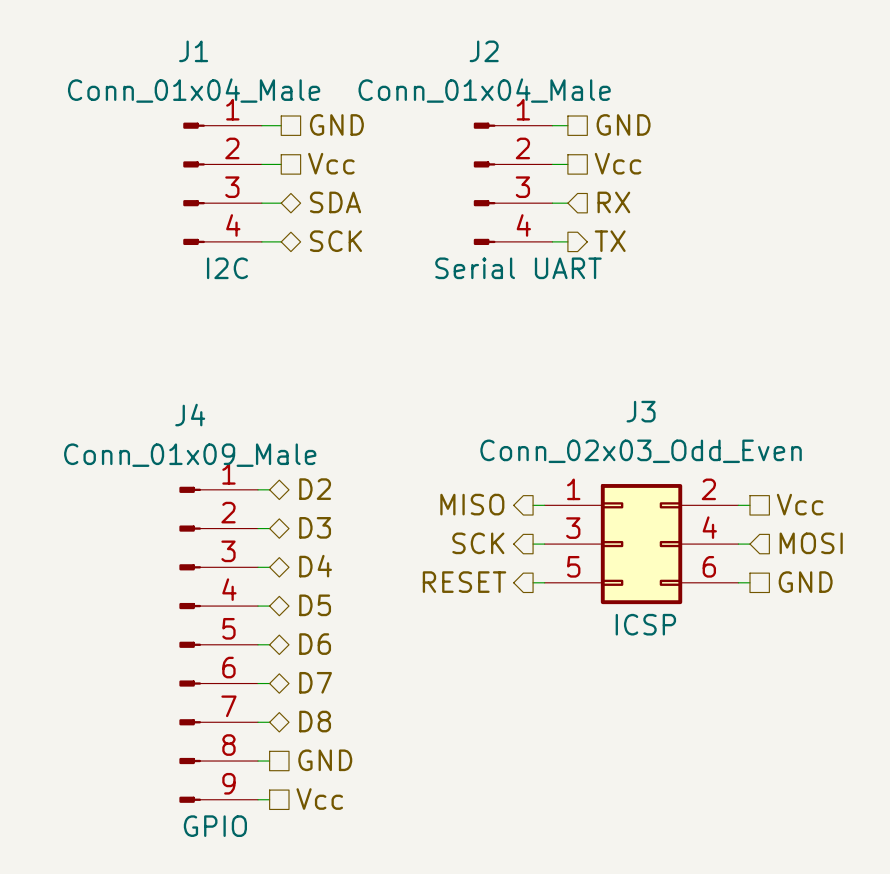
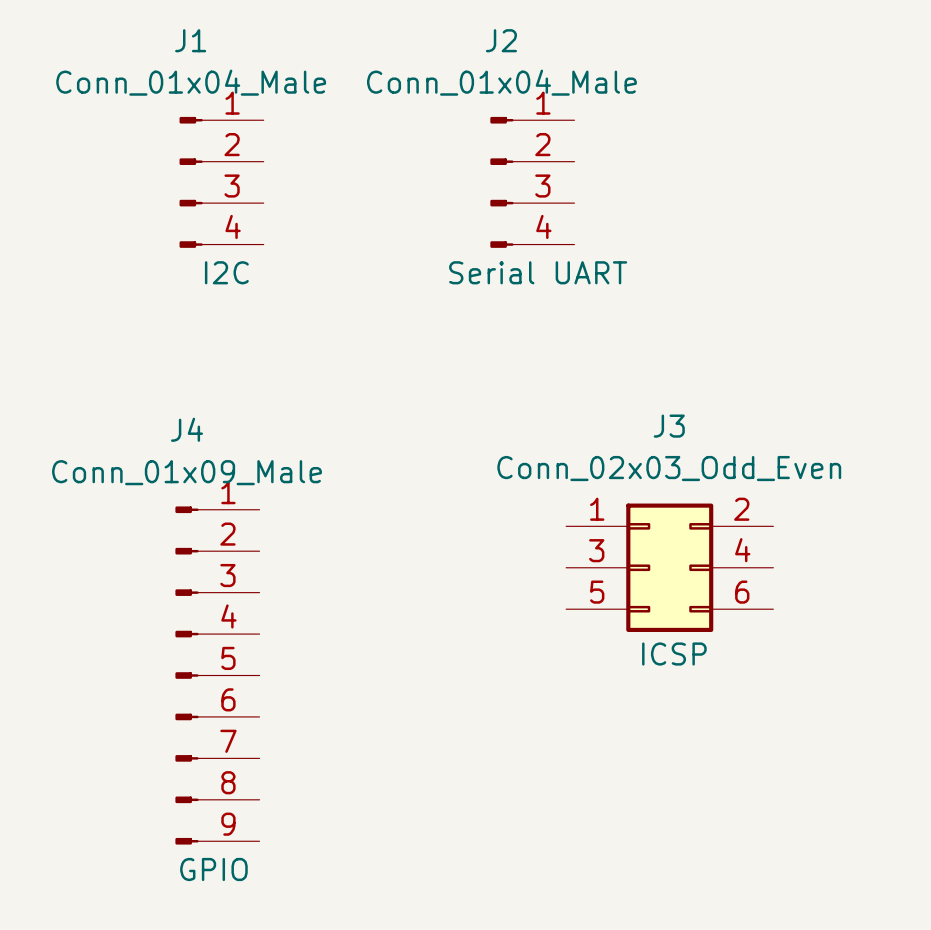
hierarchical label: GND (336, 124) -> none
hierarchical label: GND (623, 124) -> none
wire: (261, 125) (281, 125) -> none
wire: (552, 125) (567, 125) -> none
hierarchical label: Vcc (331, 163) -> none
hierarchical label: Vcc (618, 163) -> none
wire: (261, 164) (281, 164) -> none
wire: (552, 164) (567, 164) -> none
hierarchical label: SDA (335, 202) -> none
hierarchical label: RX (613, 202) -> none
wire: (261, 203) (281, 203) -> none
wire: (552, 203) (567, 203) -> none
wire: (261, 241) (281, 241) -> none
hierarchical label: SCK (335, 241) -> none
wire: (552, 241) (567, 241) -> none
hierarchical label: TX (610, 241) -> none
wire: (258, 489) (269, 489) -> none
hierarchical label: D2 (315, 489) -> none
hierarchical label: MISO (472, 504) -> none
hierarchical label: Vcc (800, 504) -> none
wire: (533, 505) (544, 505) -> none
wire: (738, 505) (750, 505) -> none
hierarchical label: D3 (315, 527) -> none
wire: (258, 528) (269, 528) -> none
hierarchical label: SCK (478, 543) -> none
hierarchical label: MOSI (811, 543) -> none
wire: (533, 544) (544, 544) -> none
wire: (738, 544) (750, 544) -> none
hierarchical label: D4 (315, 566) -> none
wire: (258, 567) (269, 567) -> none
hierarchical label: RESET (464, 582) -> none
wire: (533, 582) (544, 582) -> none
wire: (738, 582) (750, 582) -> none
hierarchical label: GND (805, 582) -> none
hierarchical label: D5 (315, 605) -> none
wire: (258, 606) (269, 606) -> none
wire: (258, 644) (269, 644) -> none
hierarchical label: D6 (315, 644) -> none
hierarchical label: D7 (315, 682) -> none
wire: (258, 683) (269, 683) -> none
hierarchical label: D8 (315, 721) -> none
wire: (258, 722) (269, 722) -> none
hierarchical label: GND (325, 760) -> none
wire: (258, 761) (269, 761) -> none
wire: (258, 799) (269, 799) -> none
hierarchical label: Vcc (319, 799) -> none

